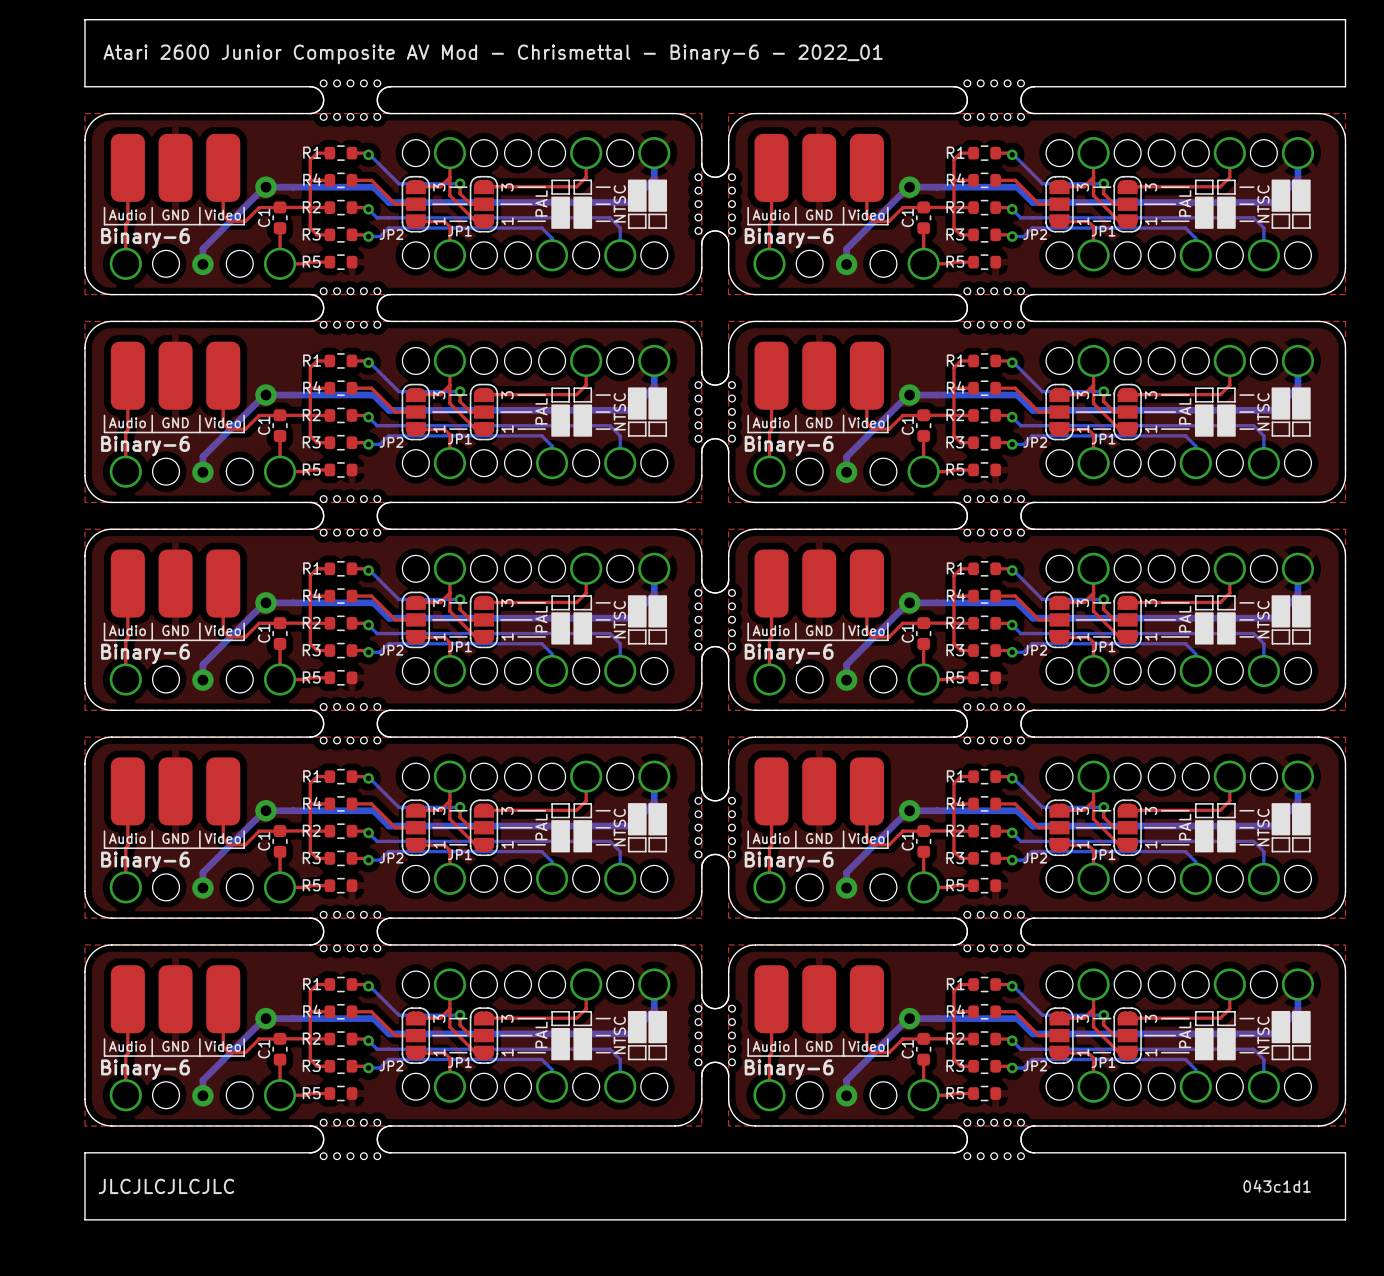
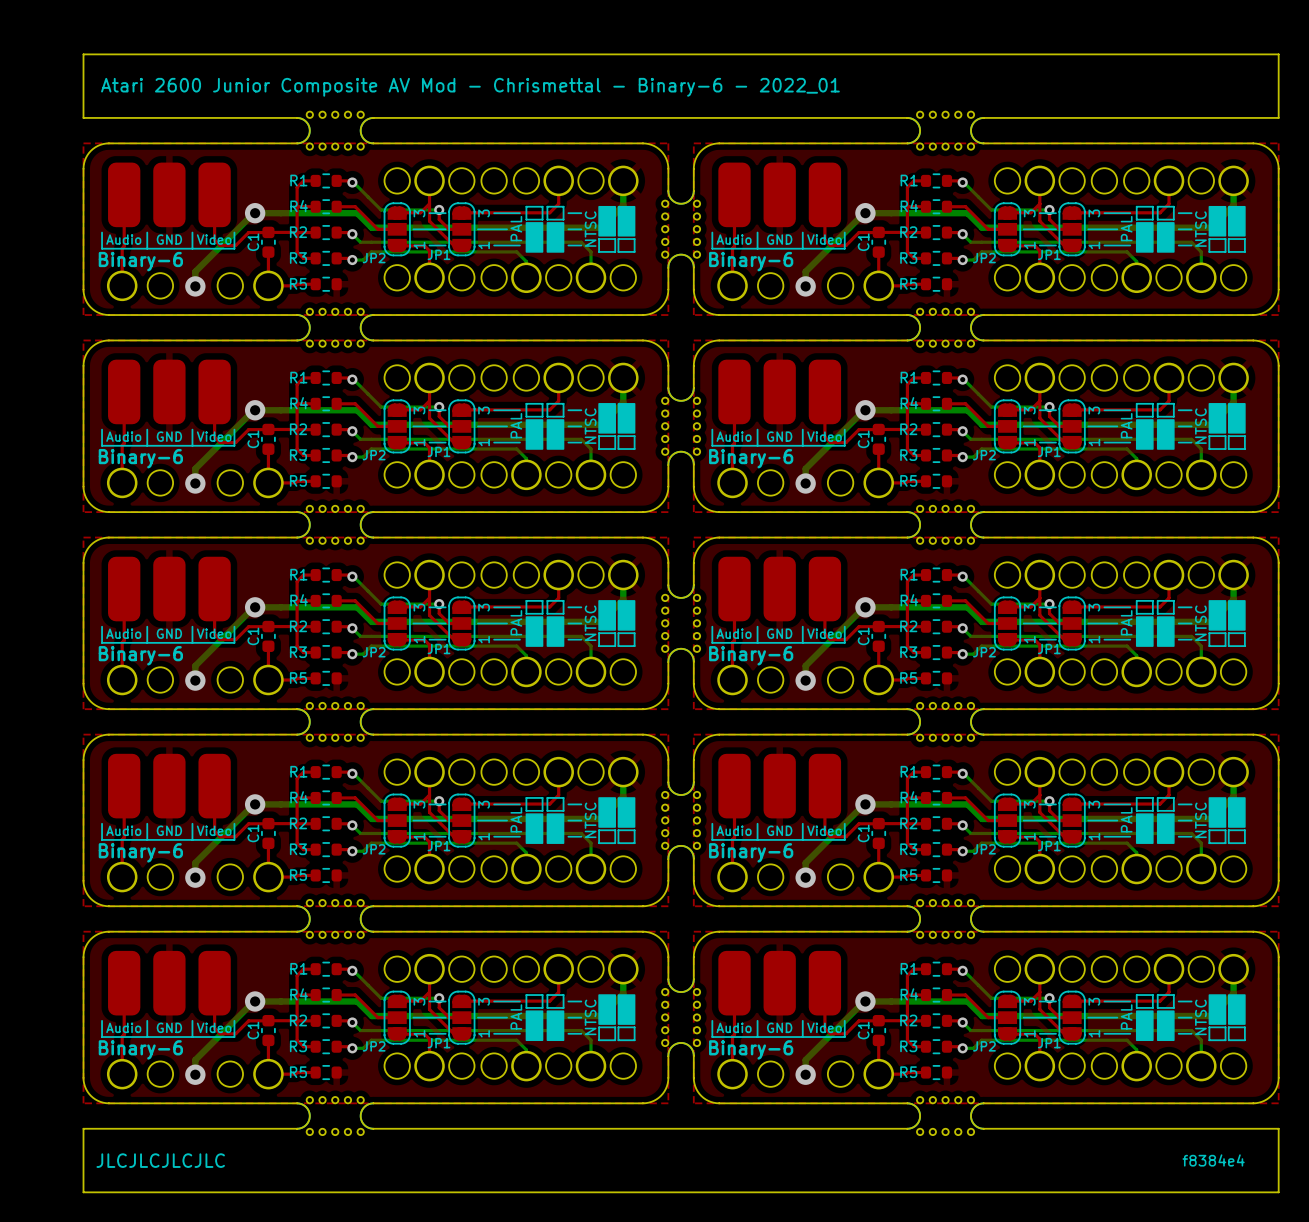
text: 043c1d1 (1277, 1186) -> f8384e4 (1213, 1160)

